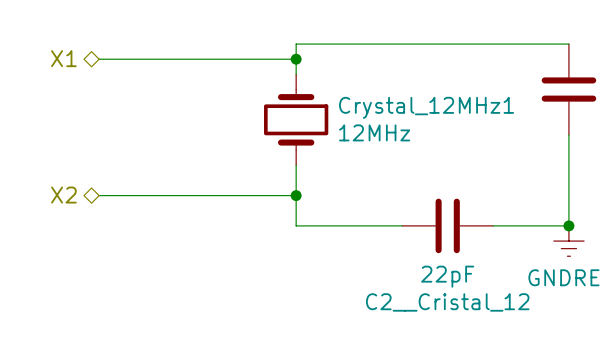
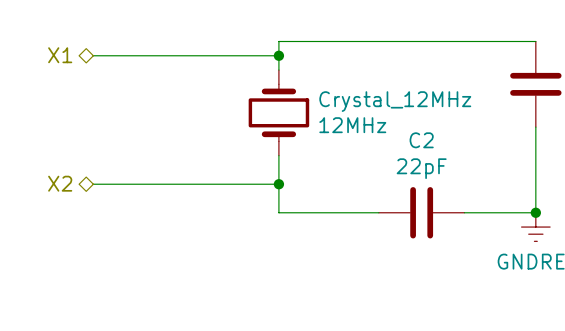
Crystal_12MHz1 name: Crystal_12MHz1 (426, 107) -> Crystal_12MHz (395, 101)
C2__Cristal_12 value position: 22pF (447, 276) -> 22pF (421, 168)
C2__Cristal_12 name: C2__Cristal_12 (447, 302) -> C2 (421, 140)

